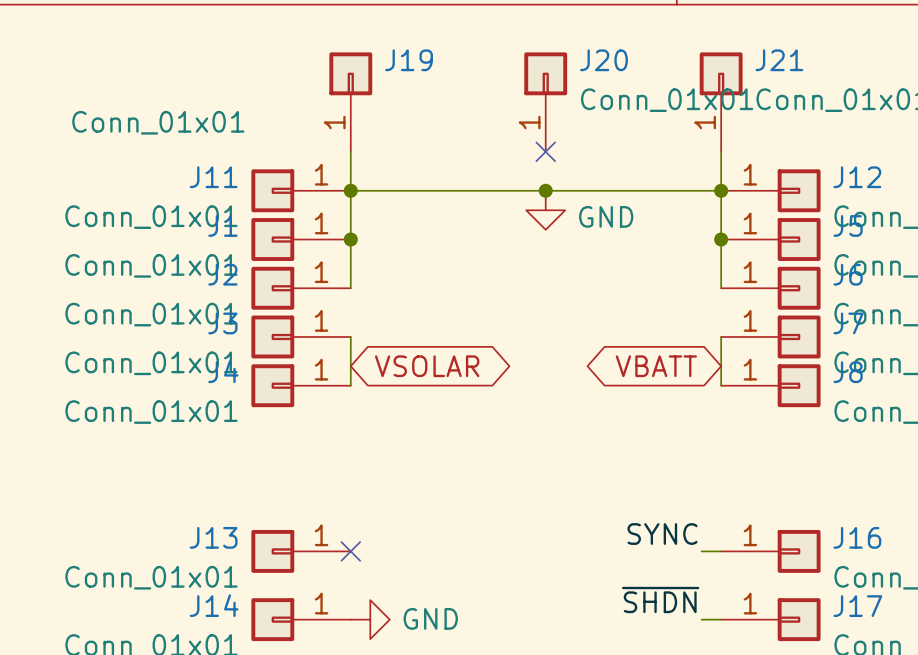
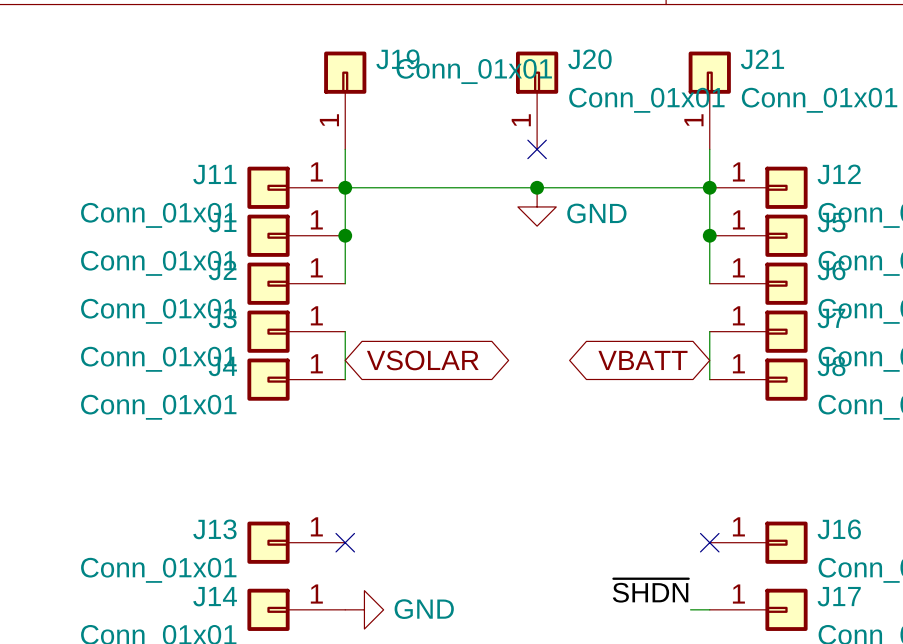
J19 value position: Conn_01x01 (158, 122) -> Conn_01x01 (474, 71)
label: SYNC (662, 534) -> none
wire: (701, 551) (721, 551) -> none
no-connect mark: none -> (709, 542)

